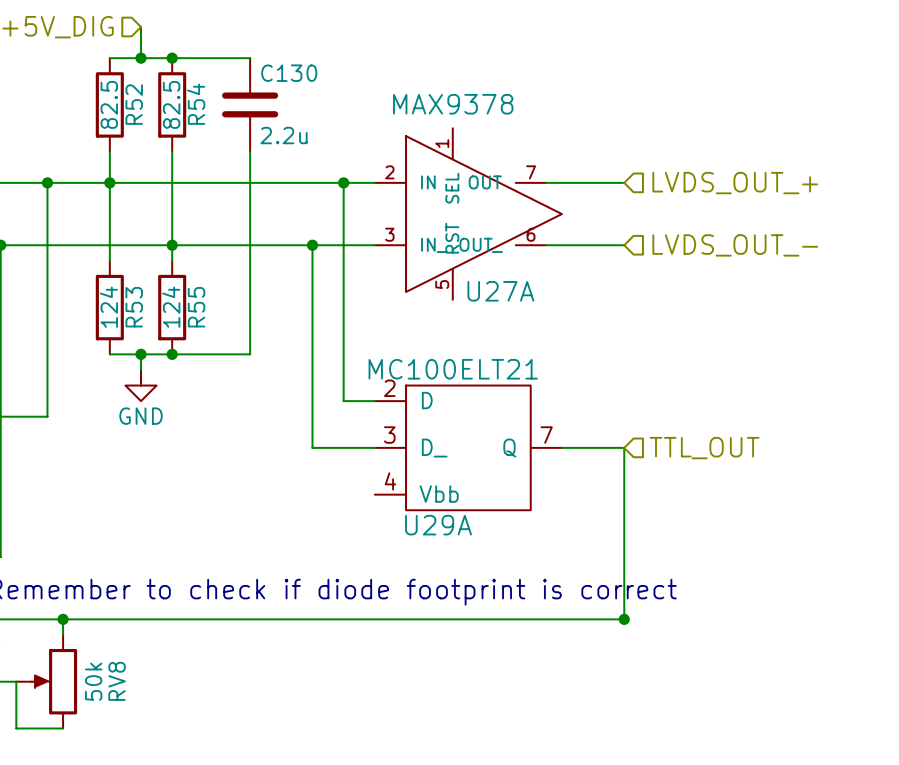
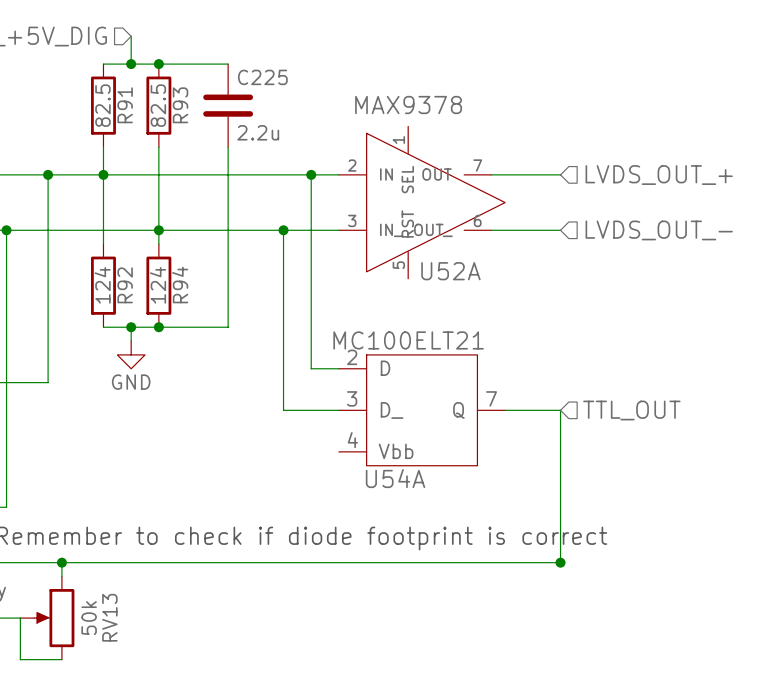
C130 name: C130 (289, 73) -> C225 (262, 77)
R52 name: R52 (134, 104) -> R91 (125, 105)
R54 name: R54 (196, 104) -> R93 (180, 105)
U27A name: U27A (500, 291) -> U52A (450, 271)
R53 name: R53 (134, 307) -> R92 (125, 285)
R55 name: R55 (196, 307) -> R94 (180, 285)
U29A name: U29A (438, 525) -> U54A (395, 478)
RV8 name: RV8 (117, 681) -> RV13 (109, 617)

